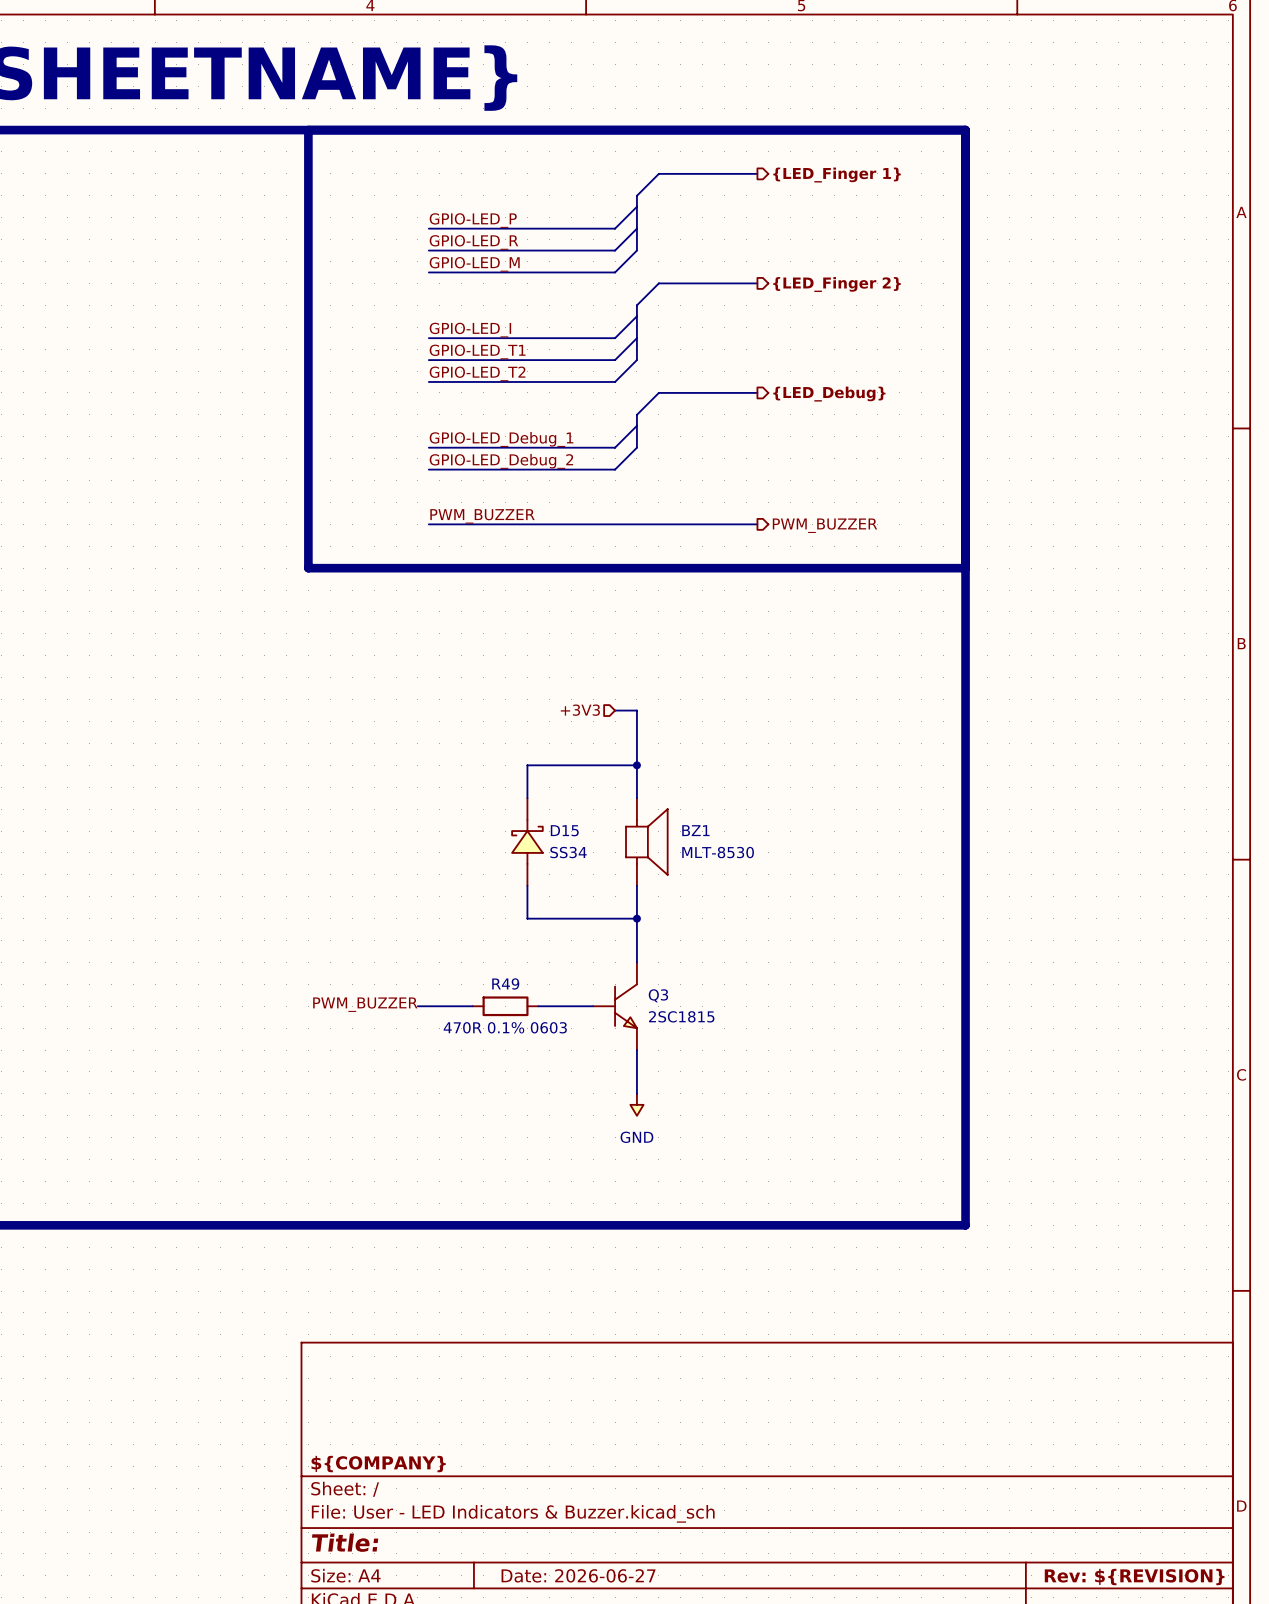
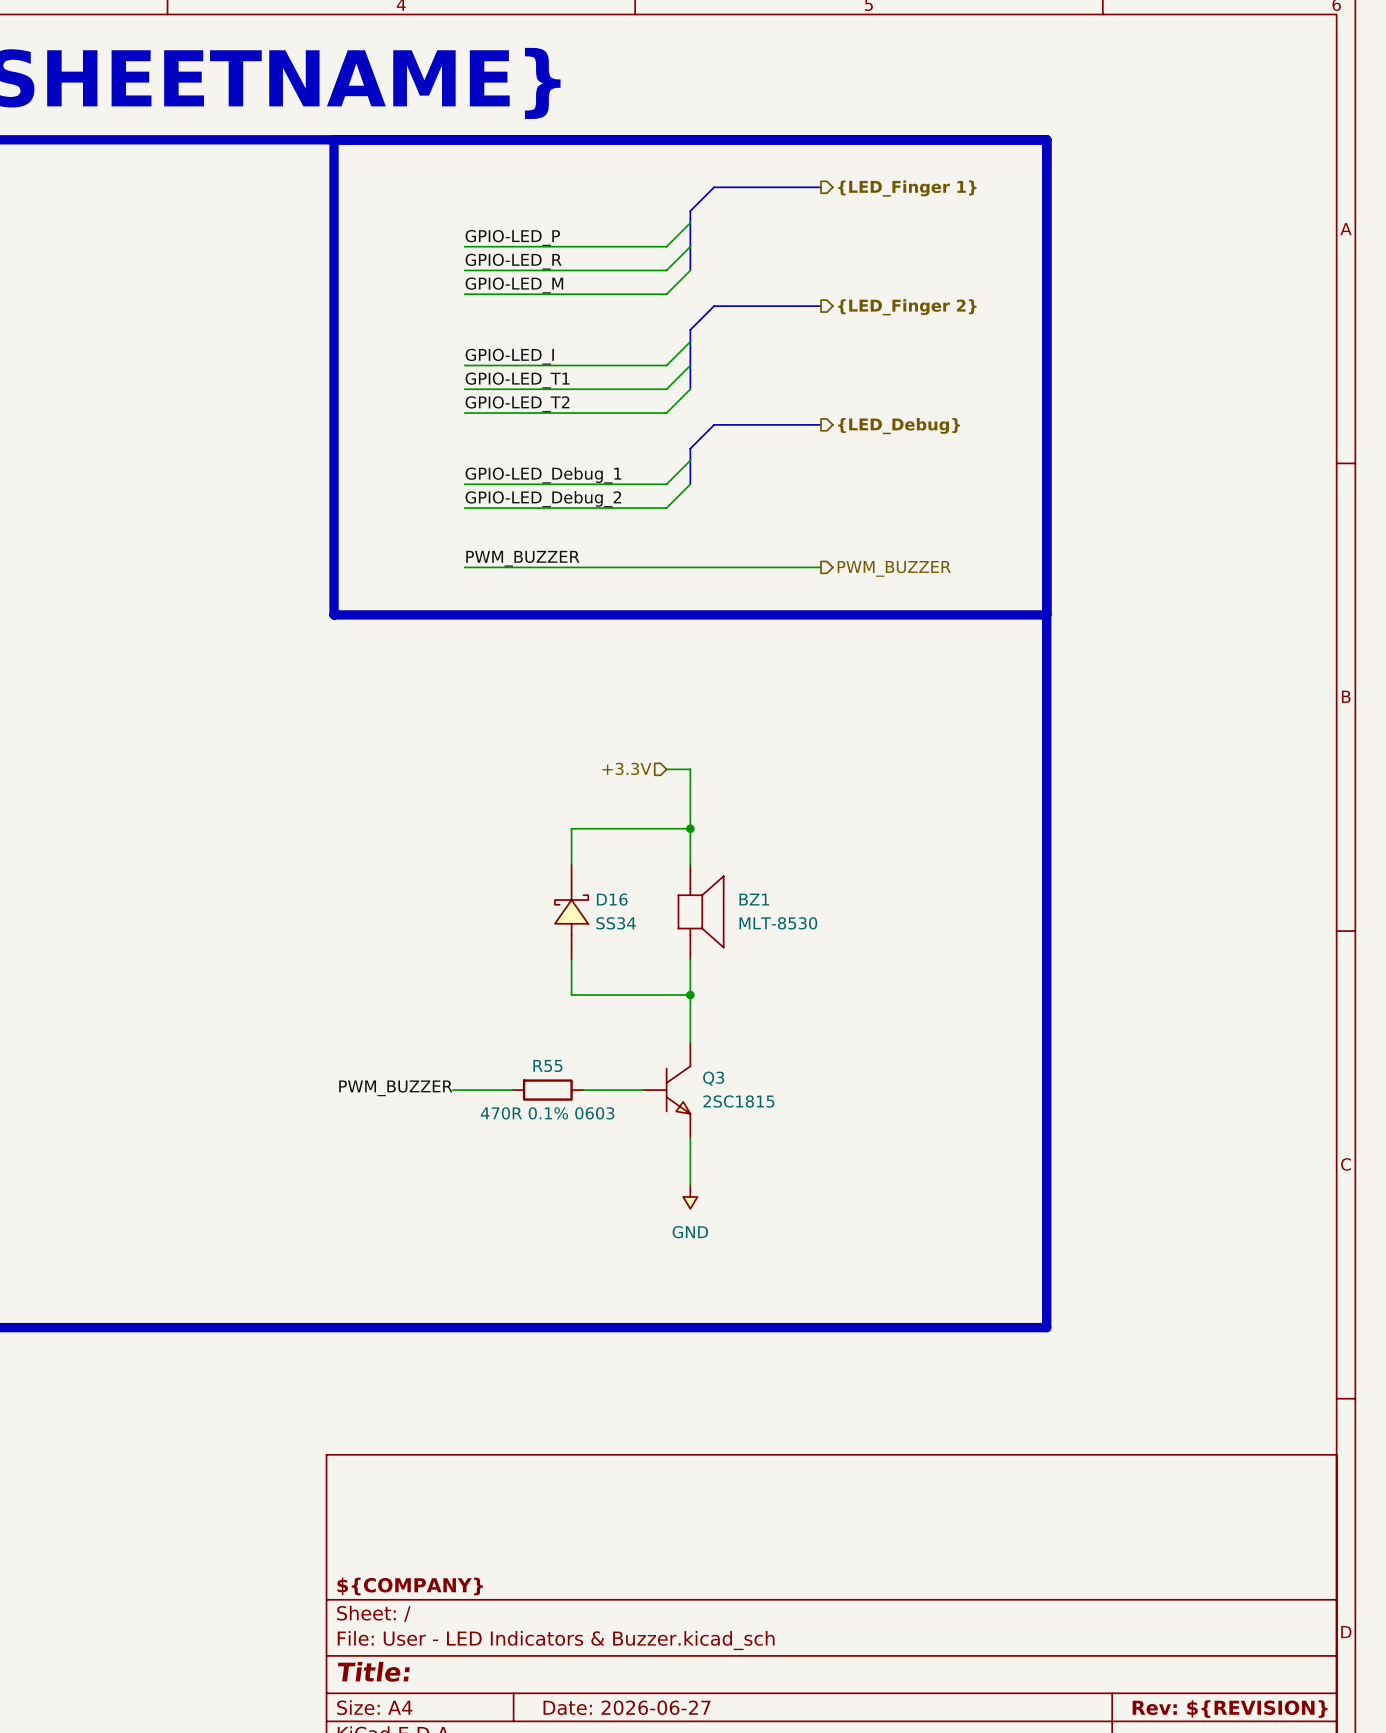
hierarchical label: +3V3 (580, 710) -> +3.3V (626, 768)
D15 name: D15 (564, 830) -> D16 (612, 899)
R49 name: R49 (505, 983) -> R55 (547, 1065)

